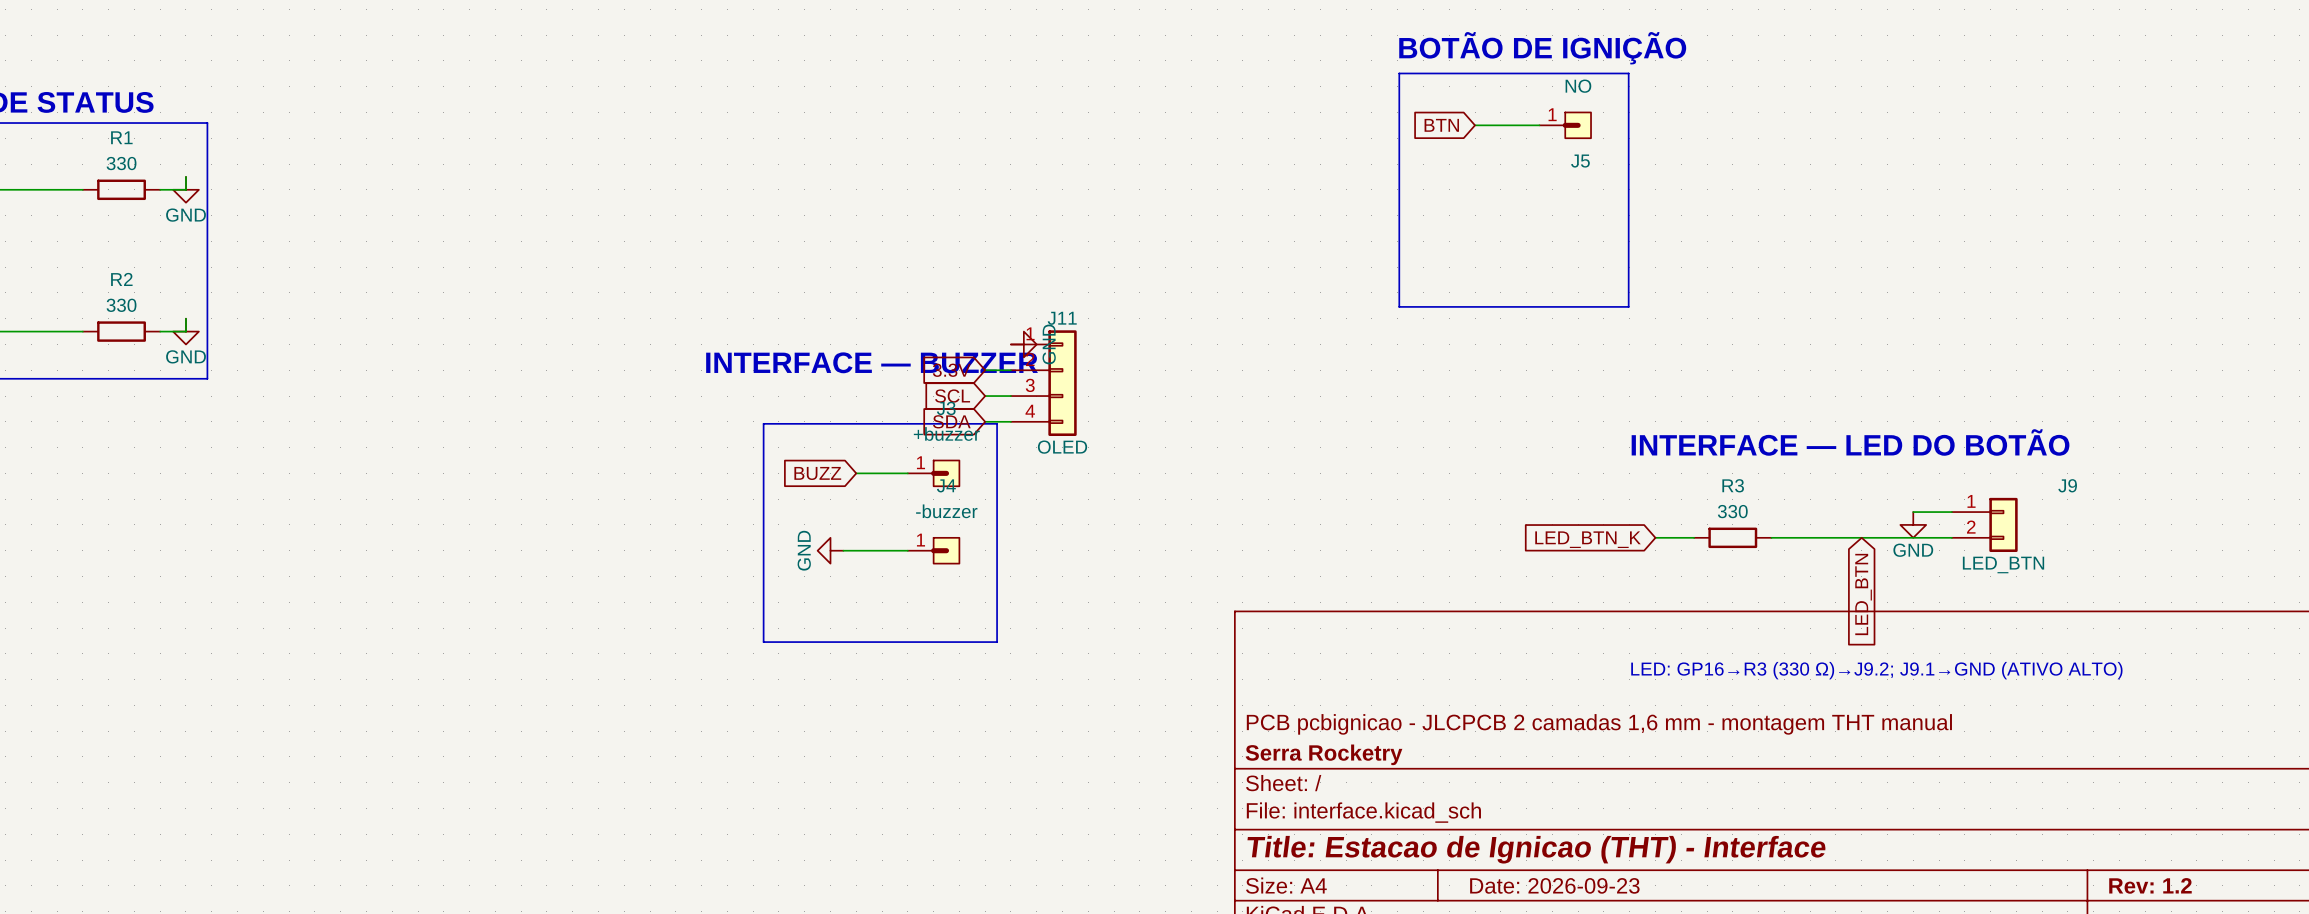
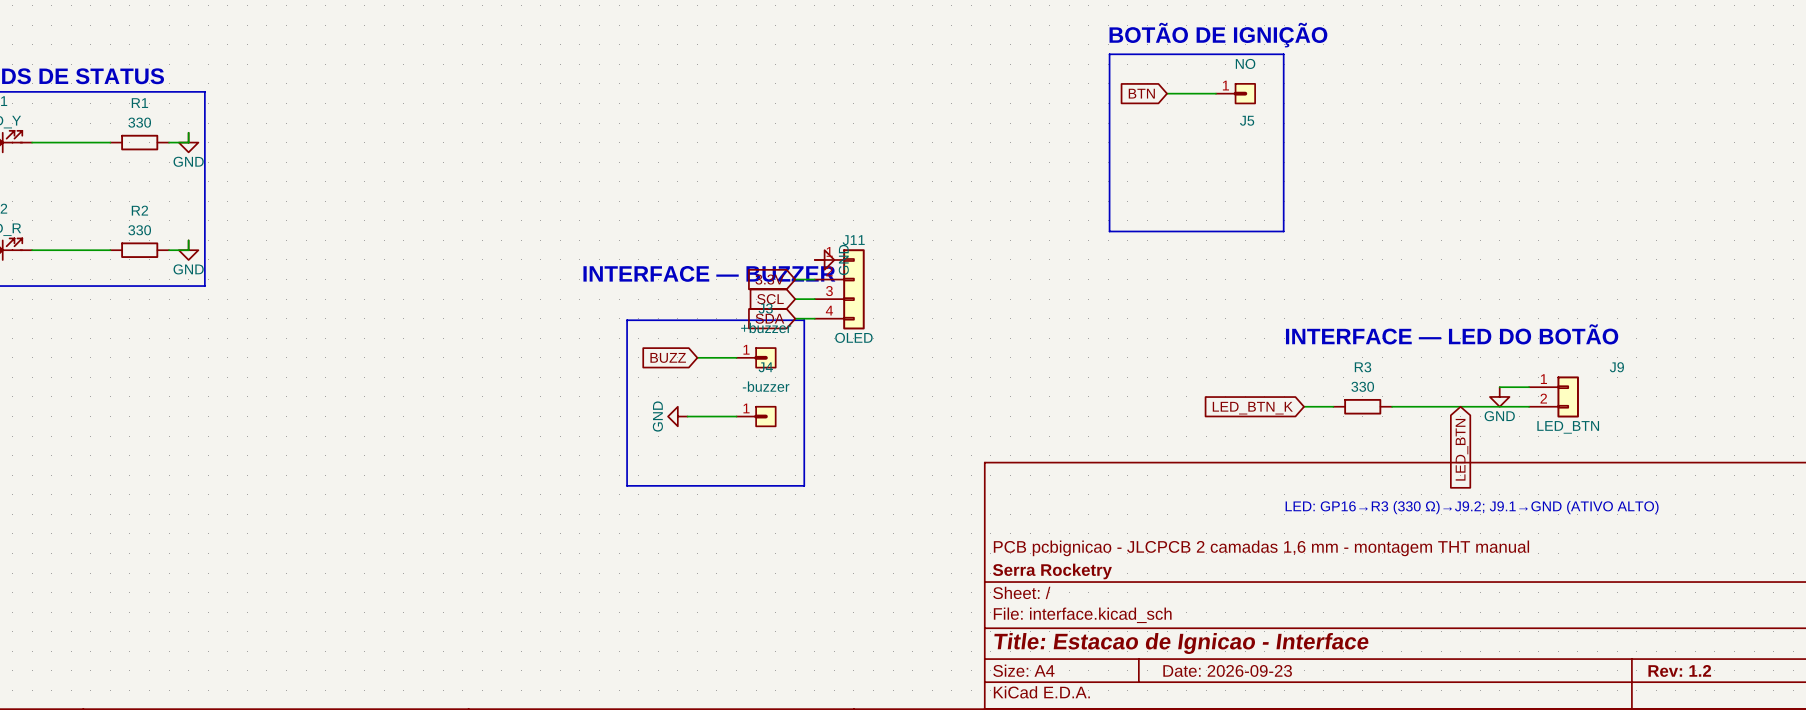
title block: Title: Estacao de Ignicao (THT) - Interface (1536, 849) -> Title: Estacao de Ignicao - Interface (1181, 643)

